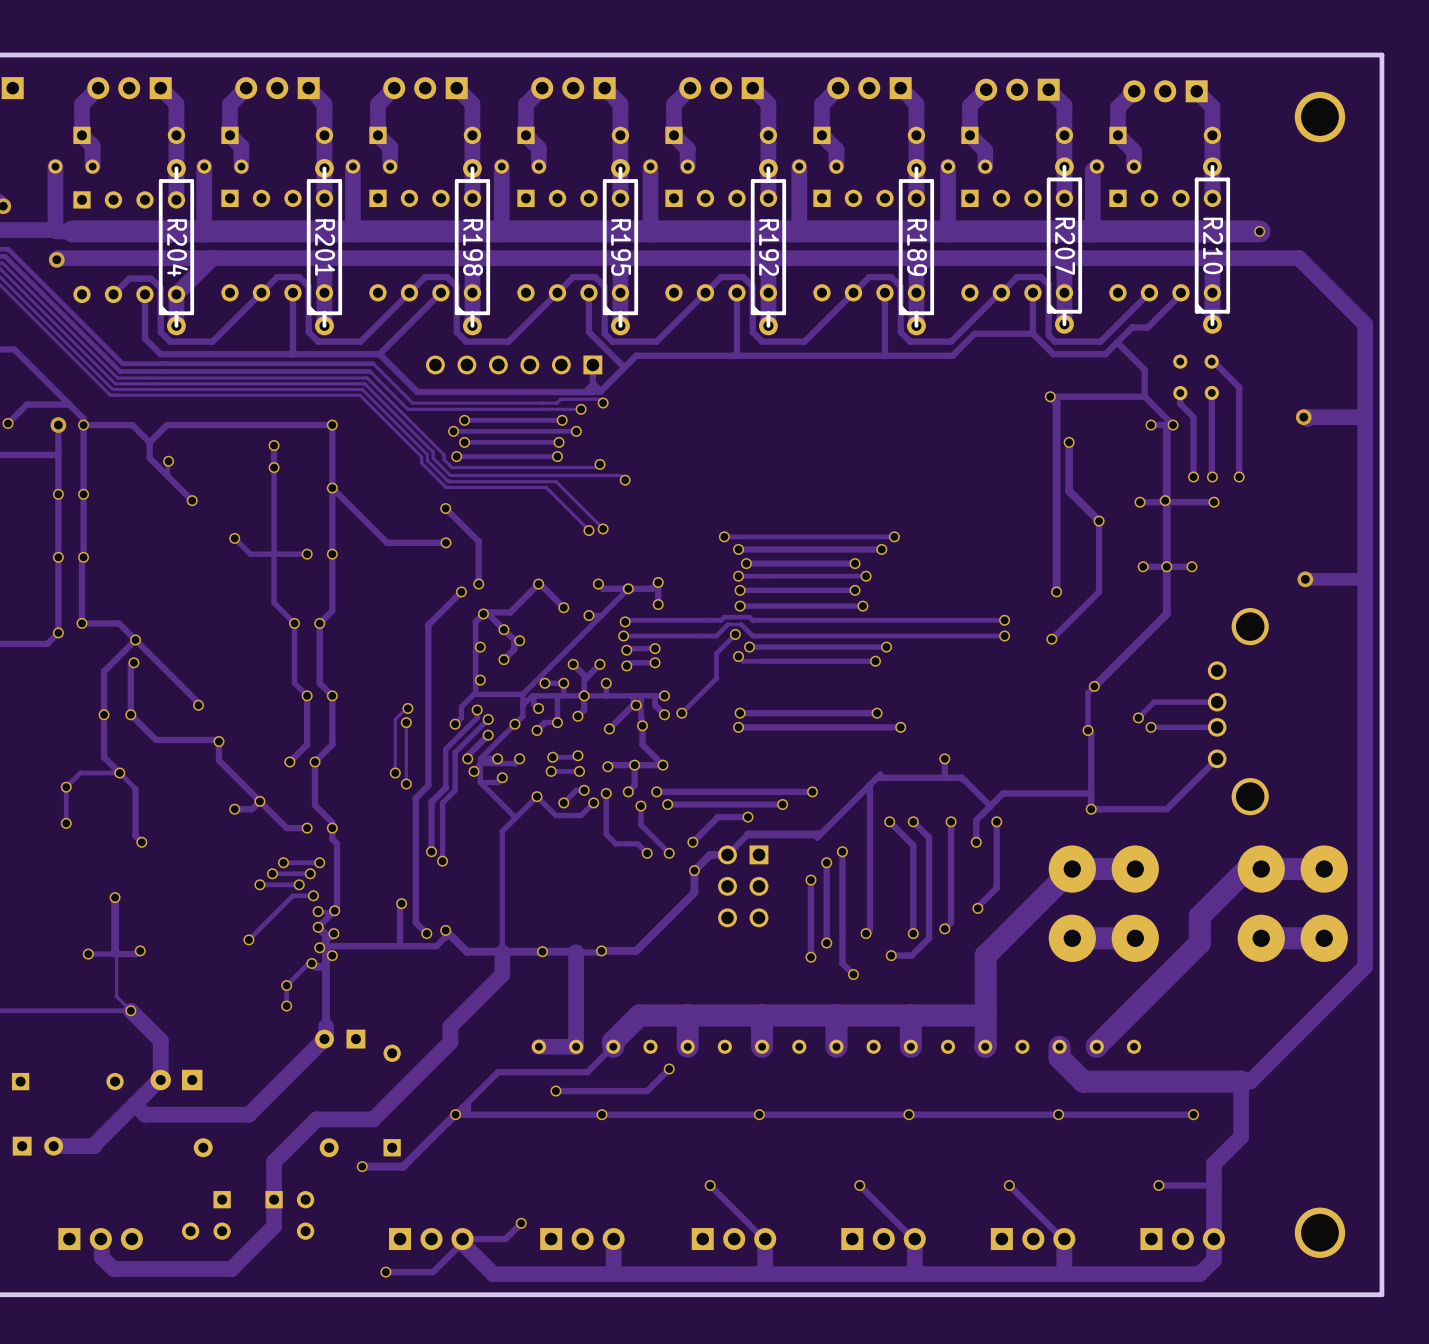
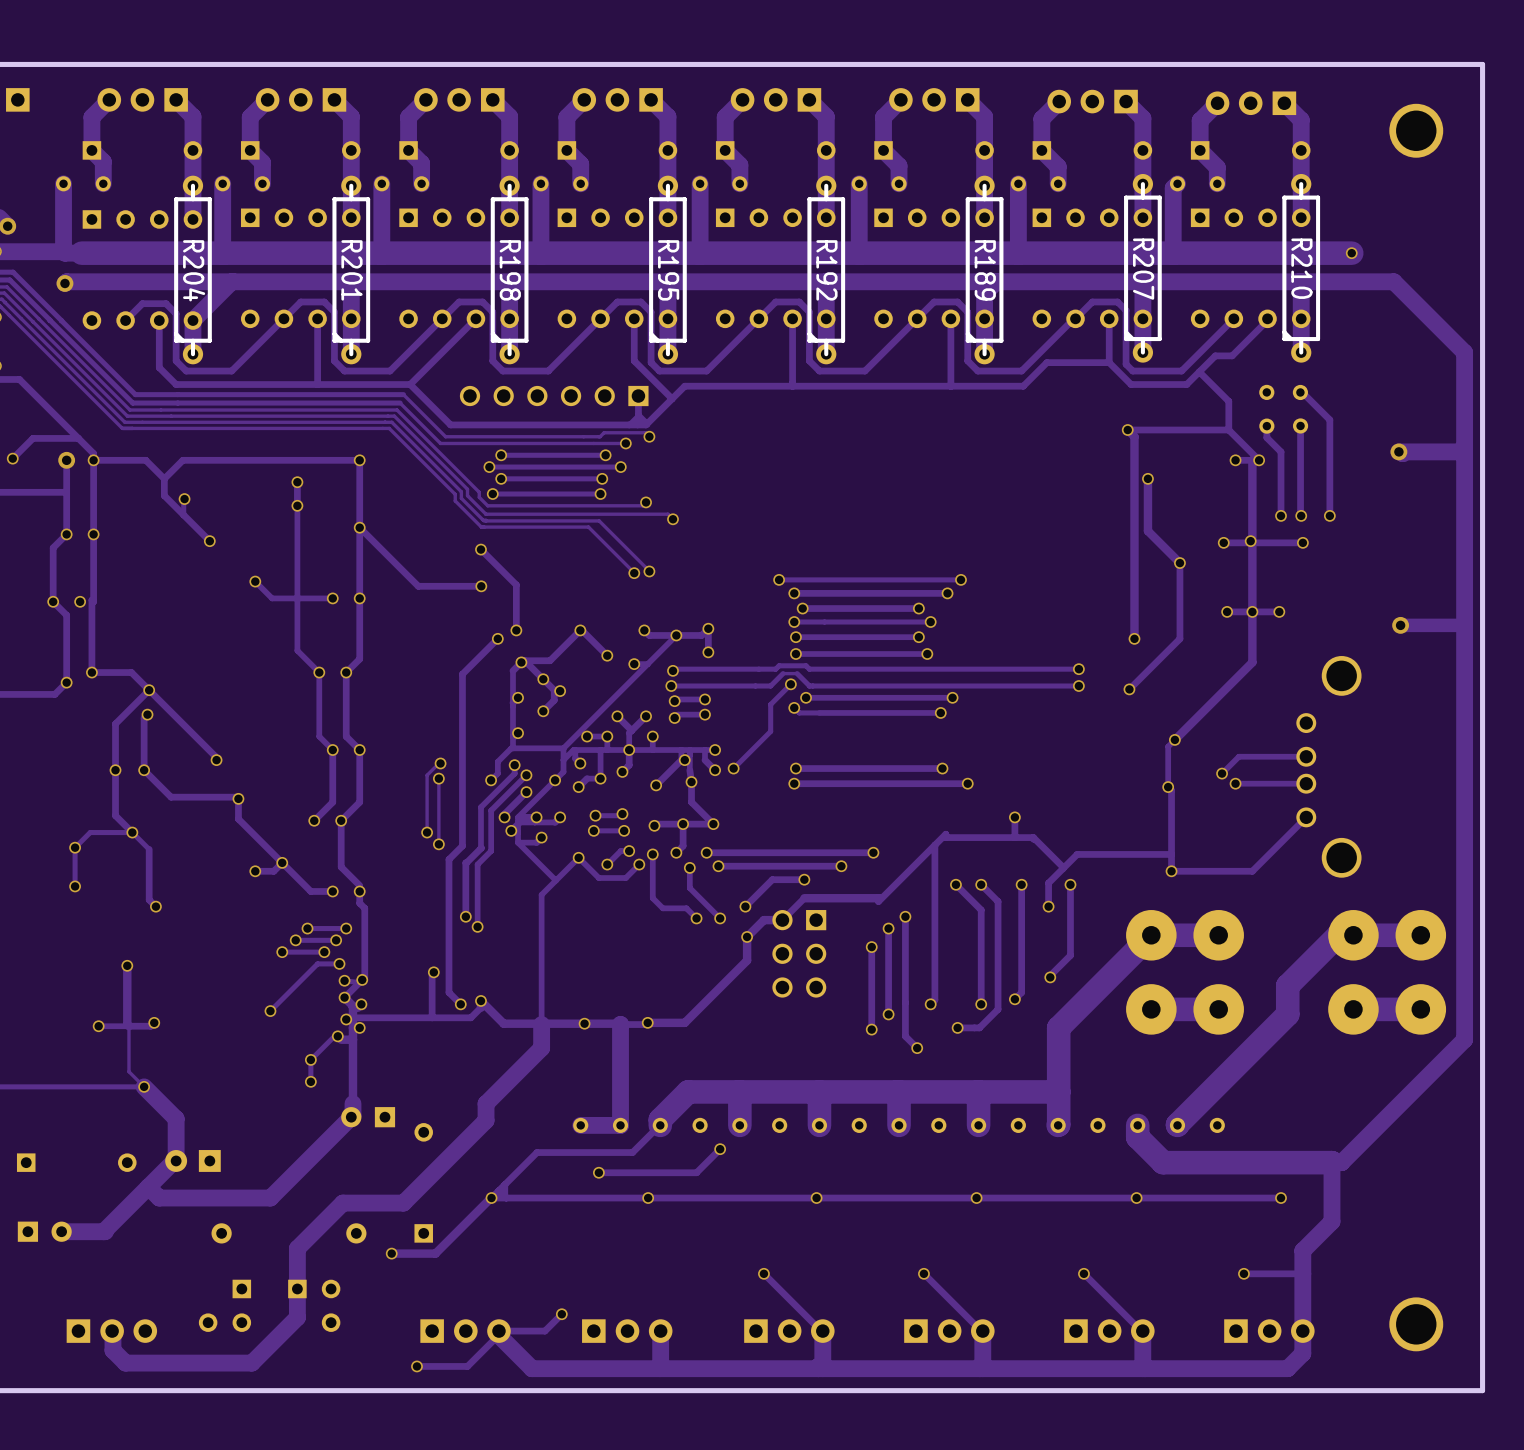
track: (58, 494) (58, 569) -> (66, 534) (53, 547) (53, 601) (66, 615)
via: none -> (53, 601)
via: (58, 557) -> none
via: none -> (80, 601)
via: (83, 557) -> none

